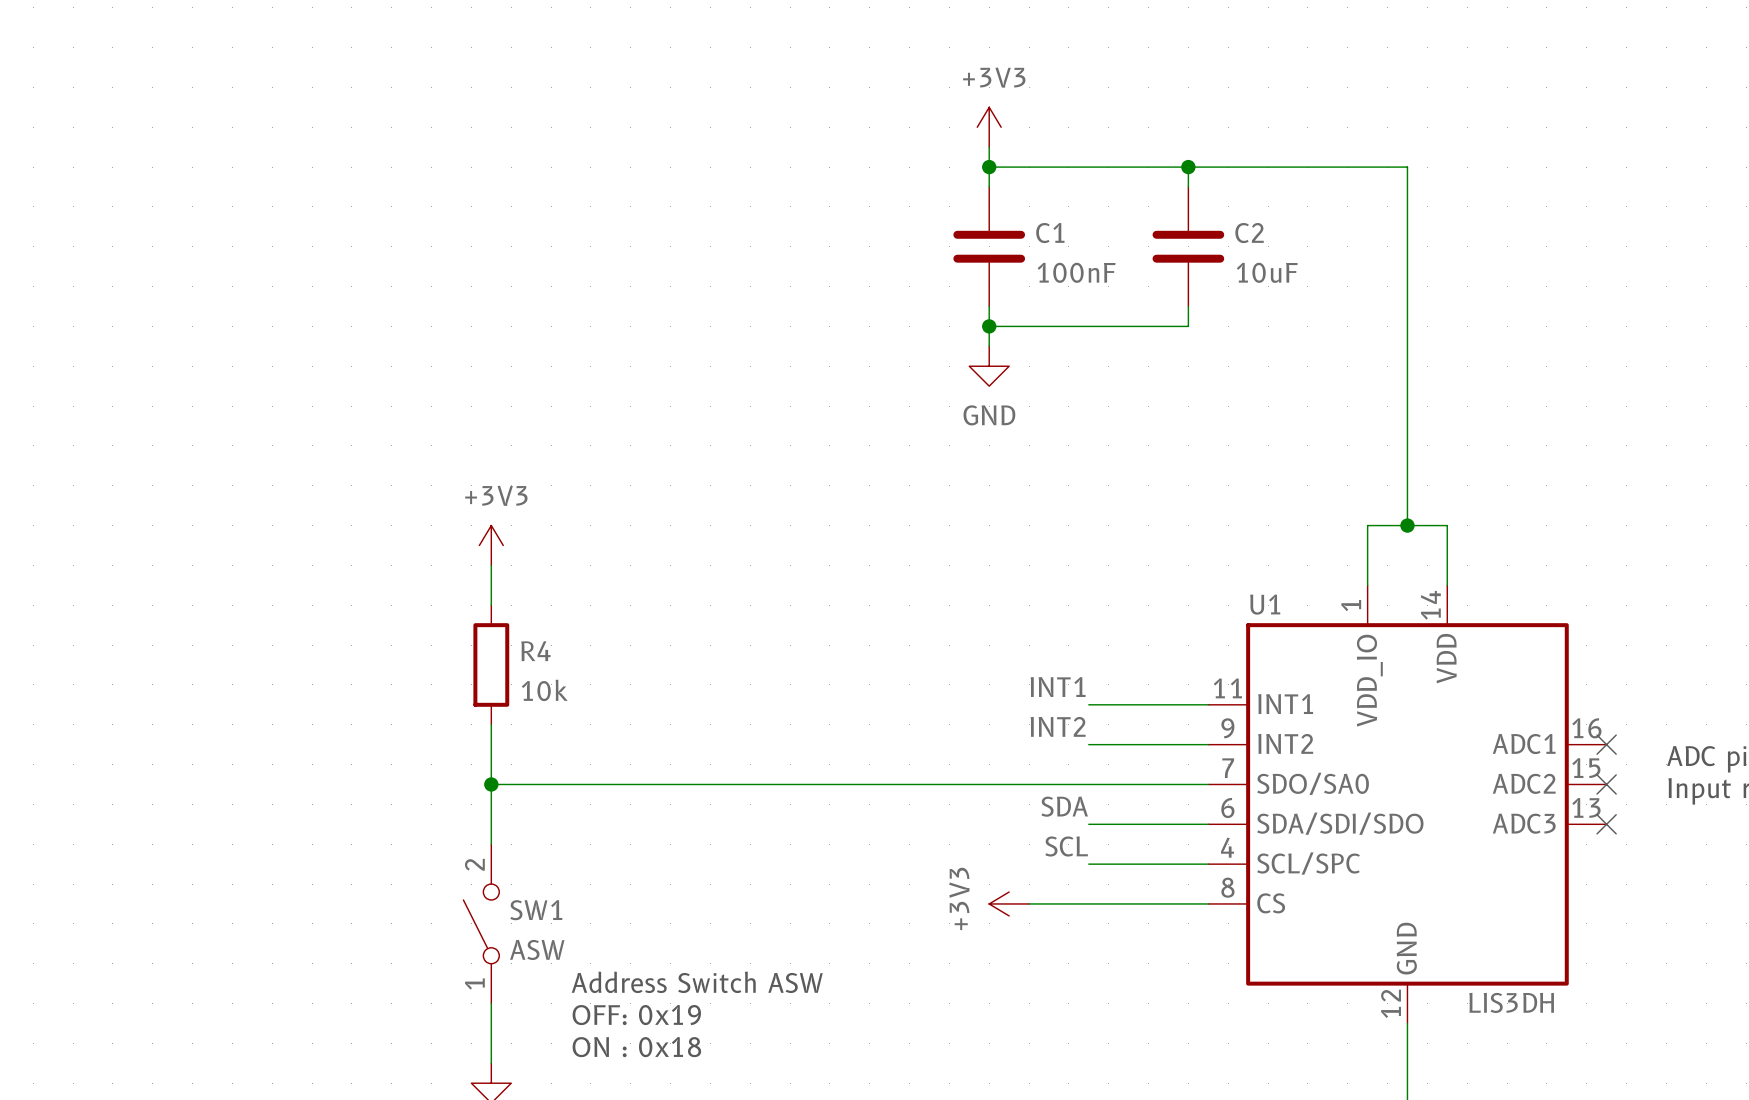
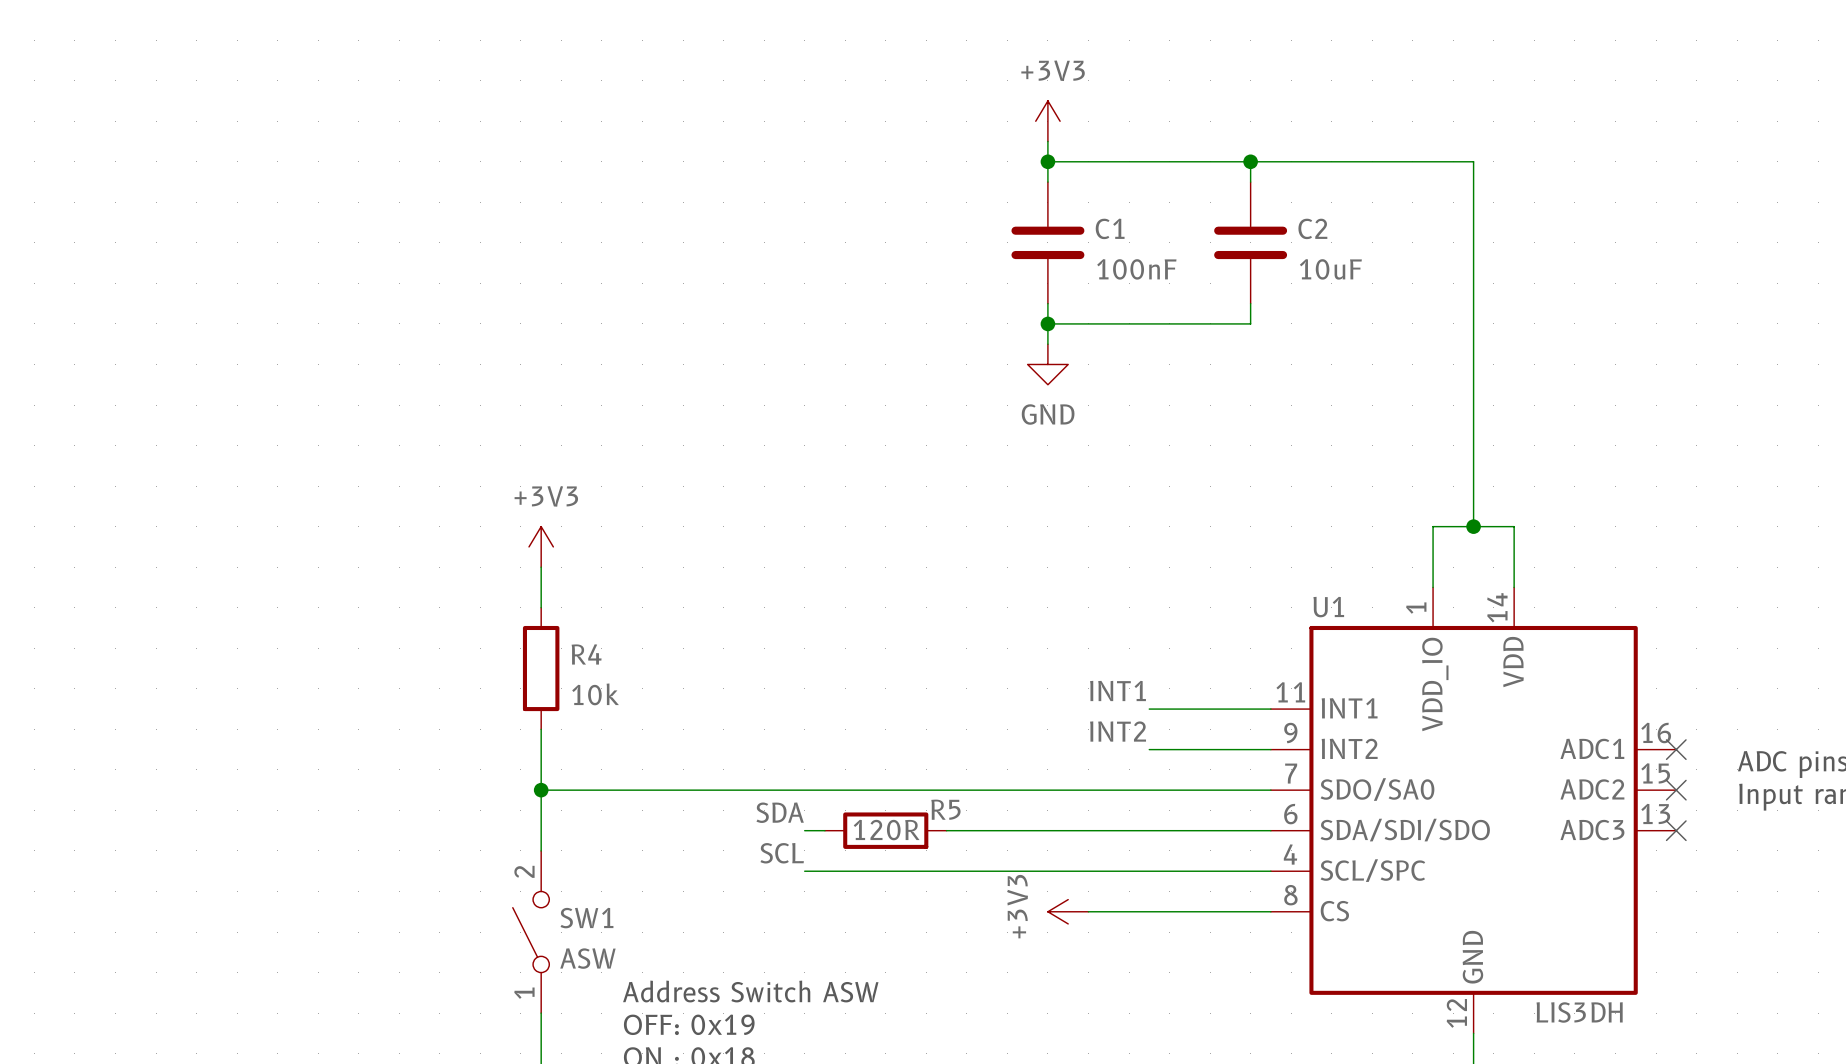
label position: SDA (1064, 806) -> SDA (780, 812)
wire: none -> (804, 830) (824, 830)
R5: none -> 120R (885, 830)
wire: none -> (946, 830) (1149, 830)
label position: SCL (1066, 846) -> SCL (782, 853)
wire: none -> (804, 871) (1149, 871)

